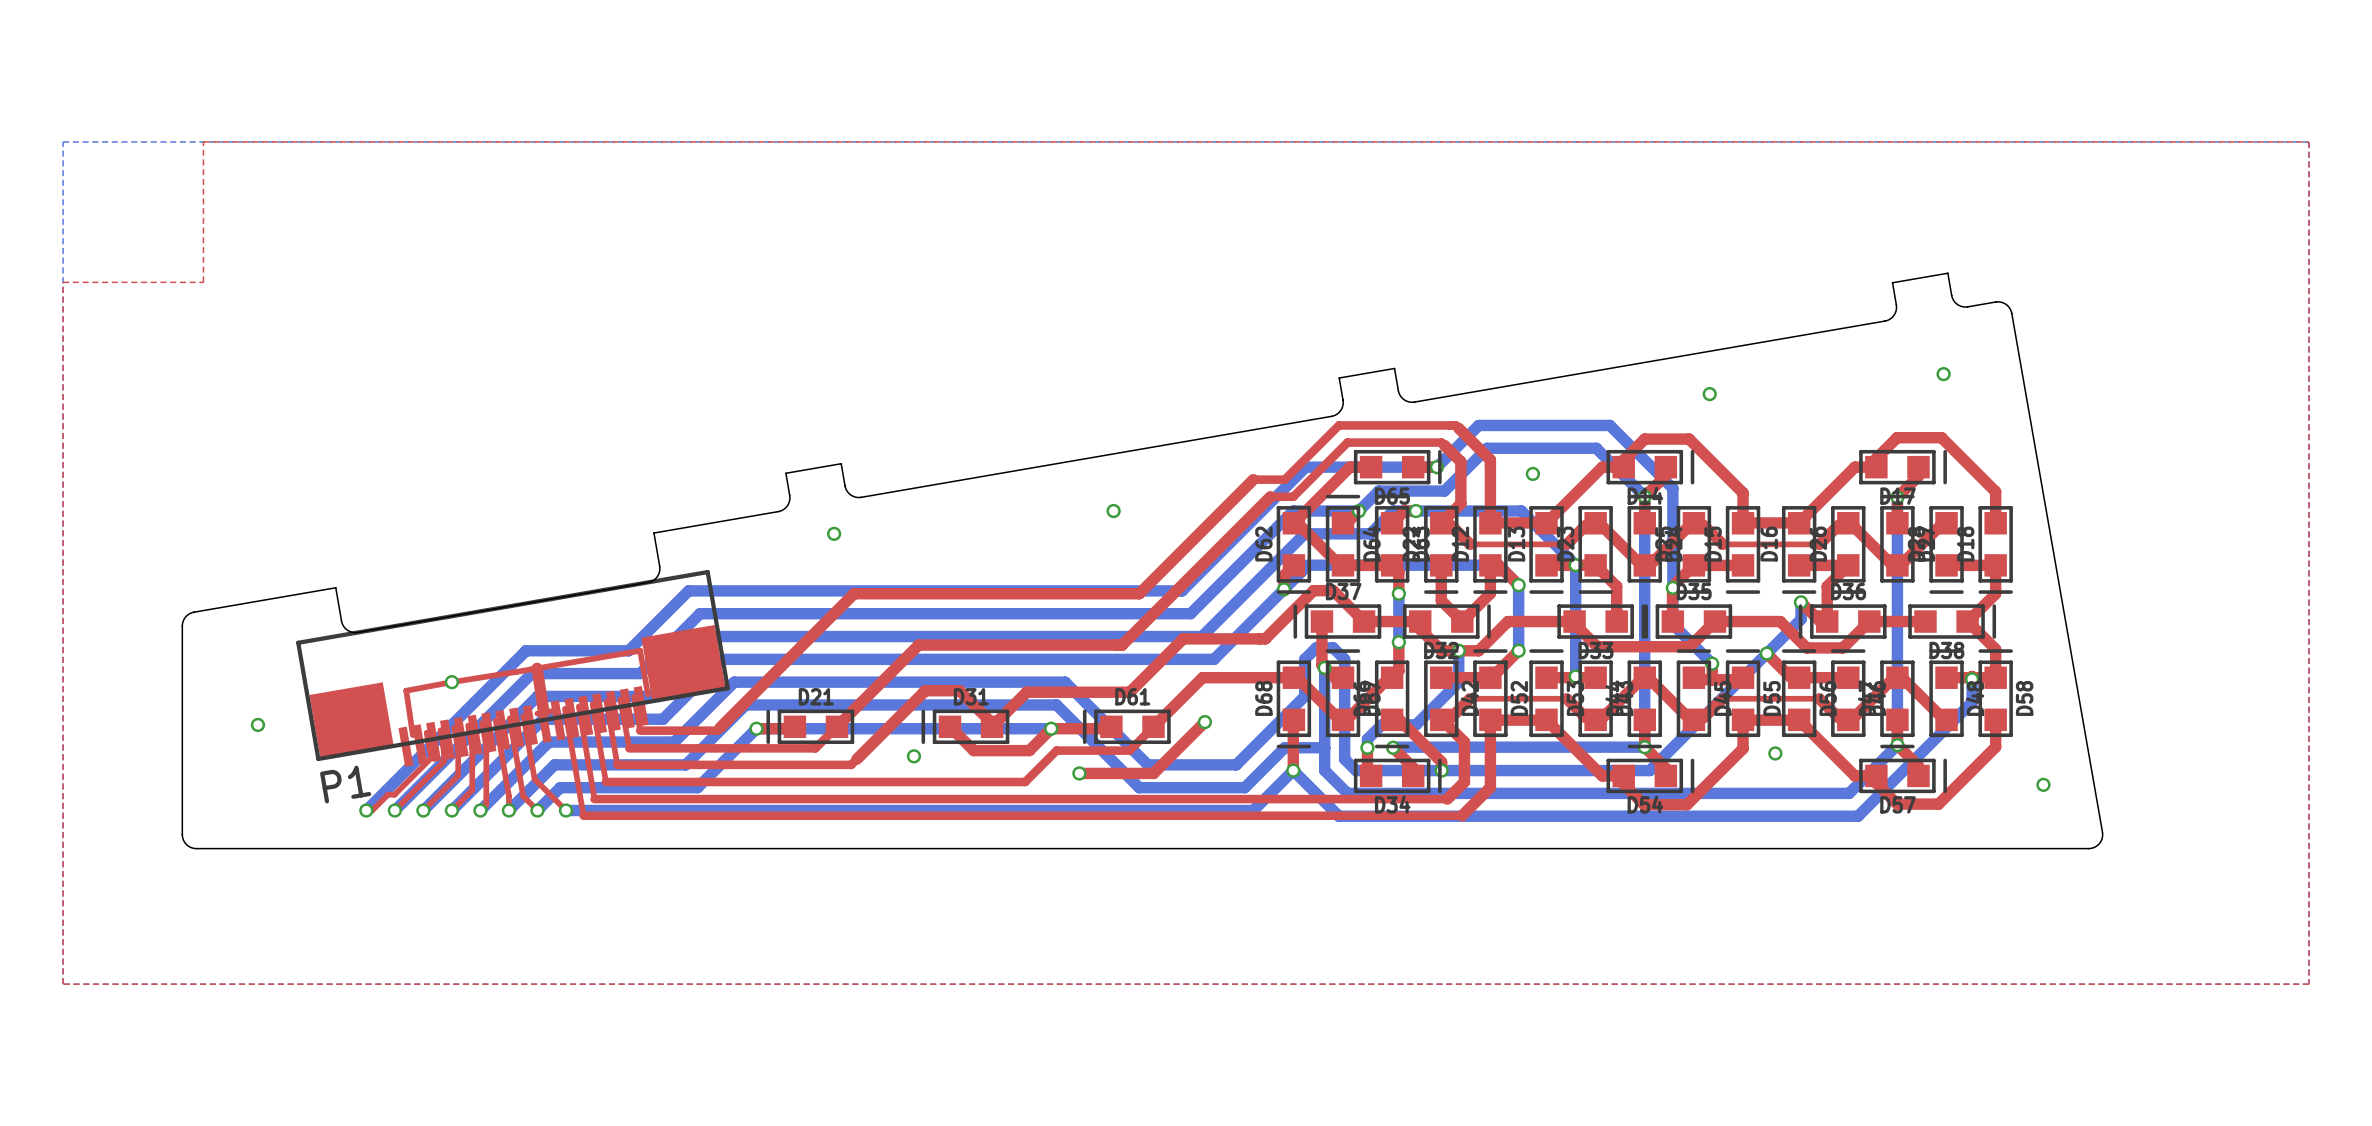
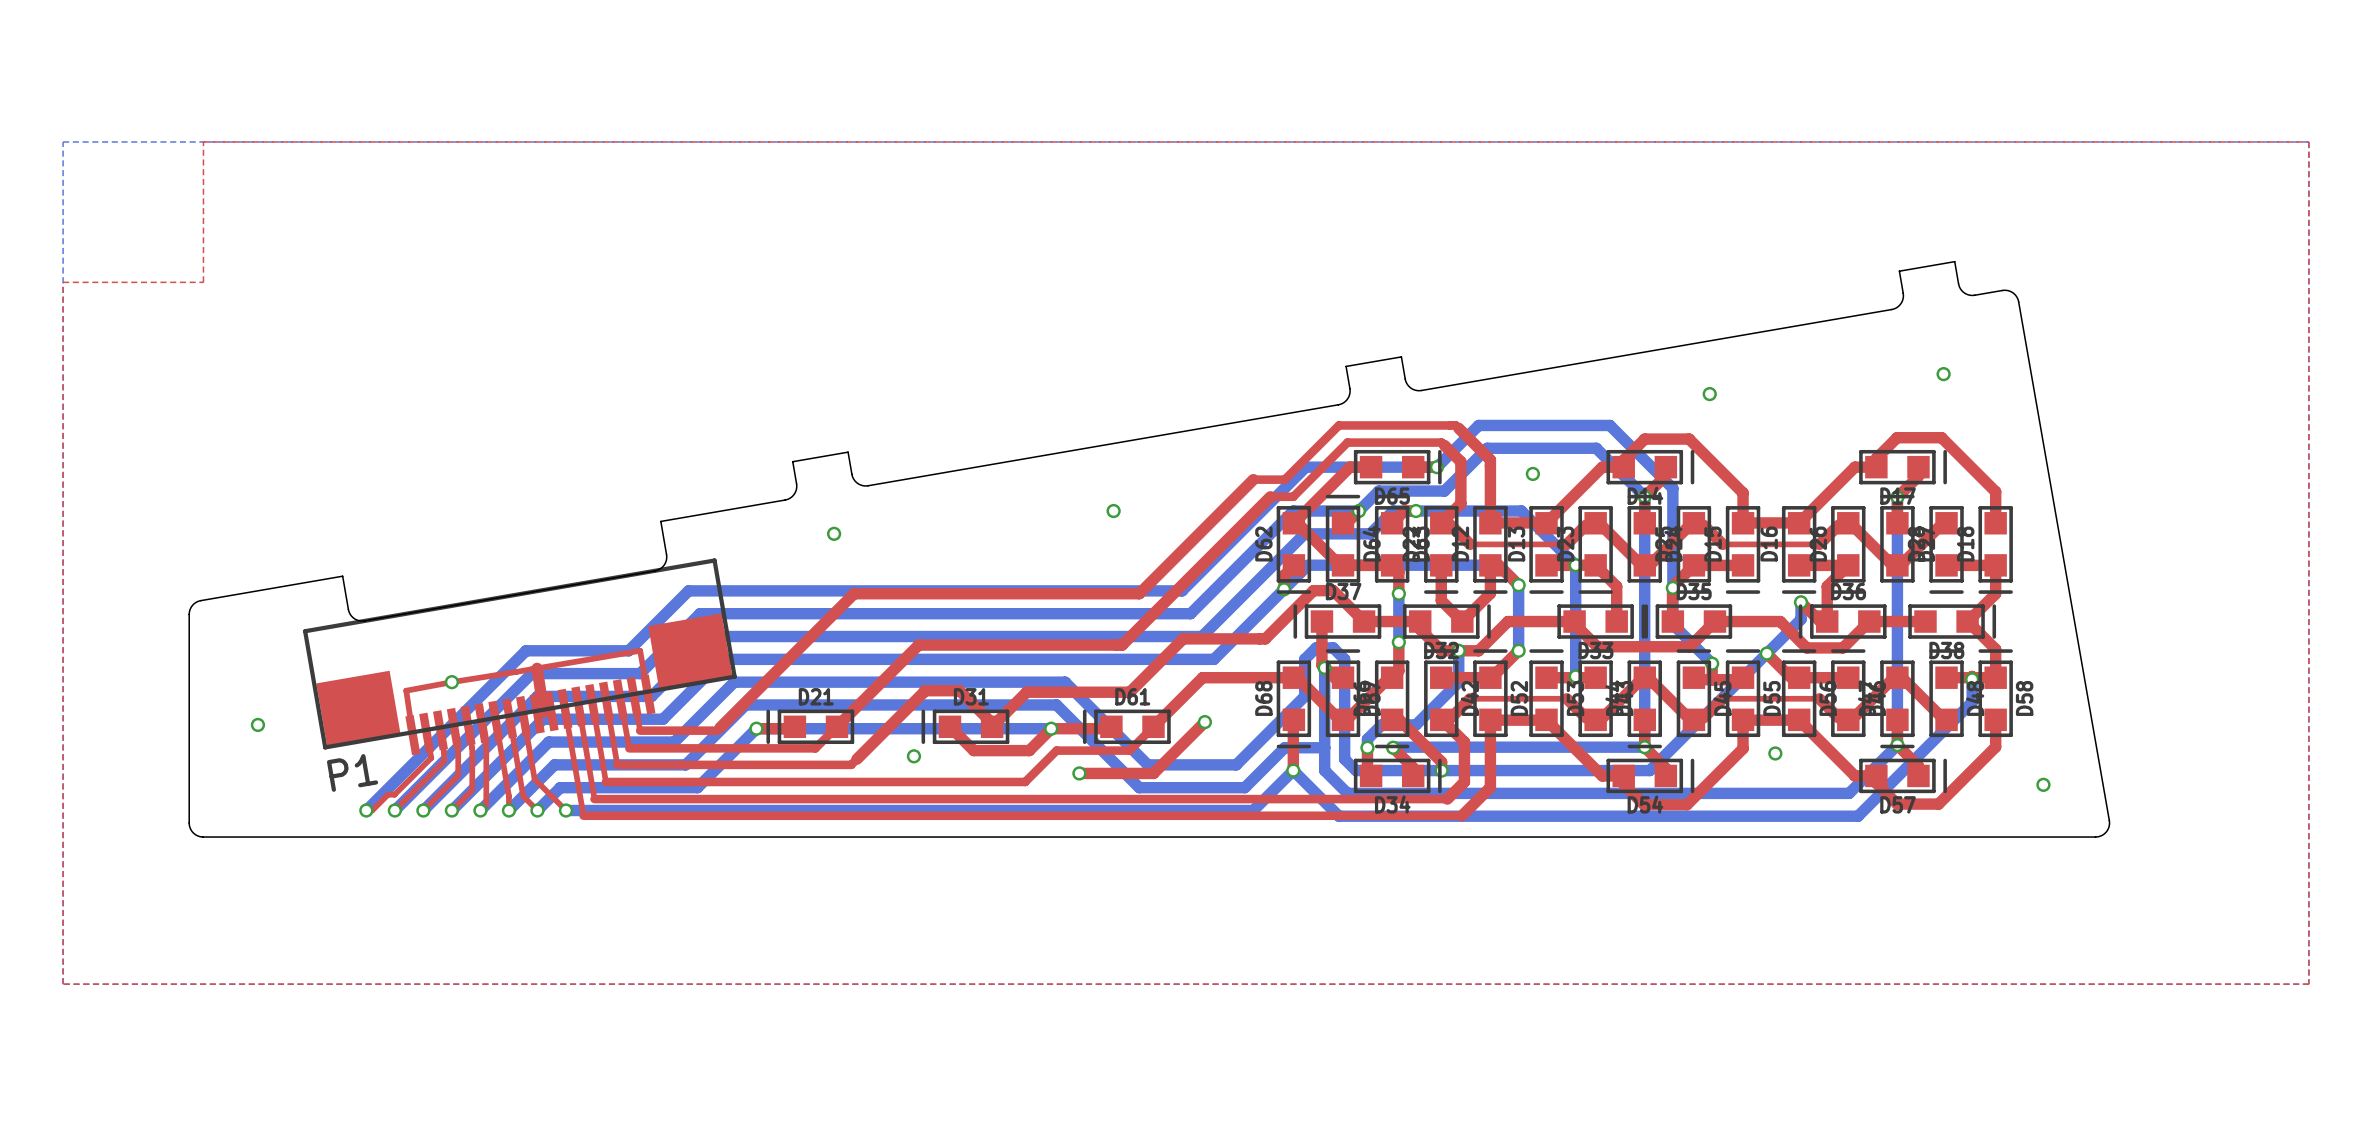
board edge: (1947, 273) (1952, 297) (1958, 305) (1966, 307) (1999, 301) (2006, 304) (2011, 311) (2102, 832) (2100, 842) (2092, 848) (196, 848) (187, 845) (183, 839) (182, 626) (184, 618) (192, 612) (335, 587) (342, 624) (347, 630) (355, 632) (648, 582) (656, 578) (659, 569) (653, 533) (781, 510) (787, 505) (789, 499) (785, 473) (841, 463) (846, 490) (854, 496) (861, 497) (1333, 415) (1339, 412) (1343, 403) (1339, 378) (1394, 368) (1399, 395) (1405, 400) (1413, 402) (1884, 321) (1892, 316) (1896, 310) (1892, 282) (1947, 273) -> (1954, 261) (1958, 285) (1965, 293) (1972, 295) (2006, 290) (2014, 293) (2018, 300) (2109, 820) (2107, 830) (2098, 836) (203, 837) (194, 833) (189, 827) (189, 614) (191, 606) (199, 601) (342, 576) (349, 612) (355, 619) (362, 621) (655, 570) (663, 566) (666, 558) (660, 521) (788, 498) (794, 494) (796, 487) (792, 461) (848, 452) (853, 479) (860, 485) (868, 485) (1340, 404) (1346, 400) (1350, 392) (1346, 366) (1401, 356) (1406, 383) (1412, 388) (1419, 390) (1891, 309) (1898, 306) (1903, 298) (1899, 271) (1954, 261)
P1 position: (513, 668) -> (519, 656)

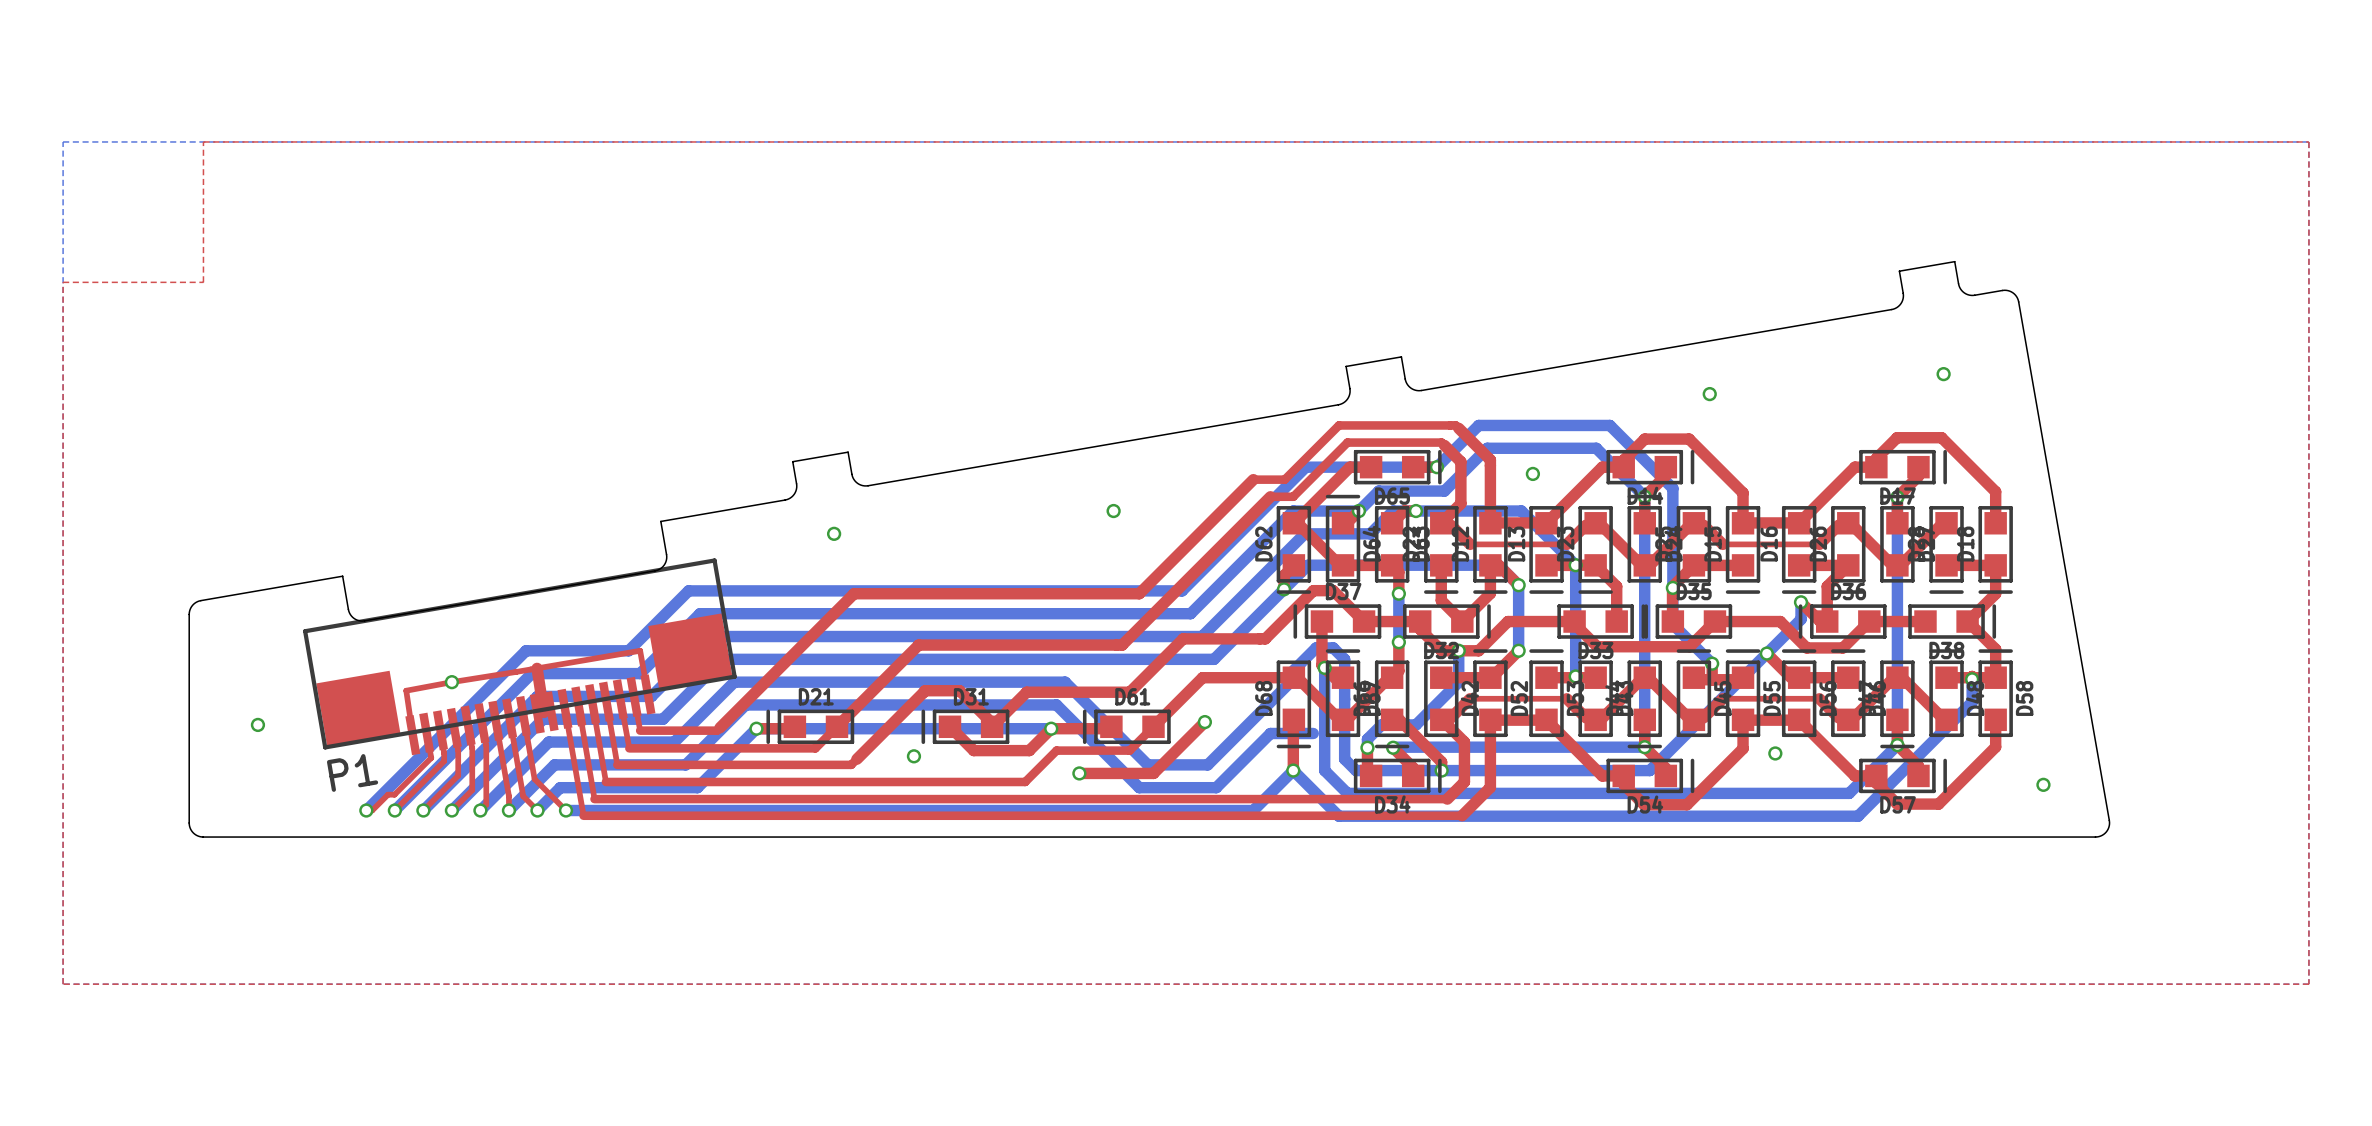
bottom track: (1304, 659) (1304, 696) (1236, 764) (1207, 764) -> (1304, 659) (1290, 673) (1290, 682) (1207, 764)
bottom track: (1324, 747) (1284, 747) (1244, 787) (1216, 787) -> (1313, 733) (1270, 733) (1216, 787)

